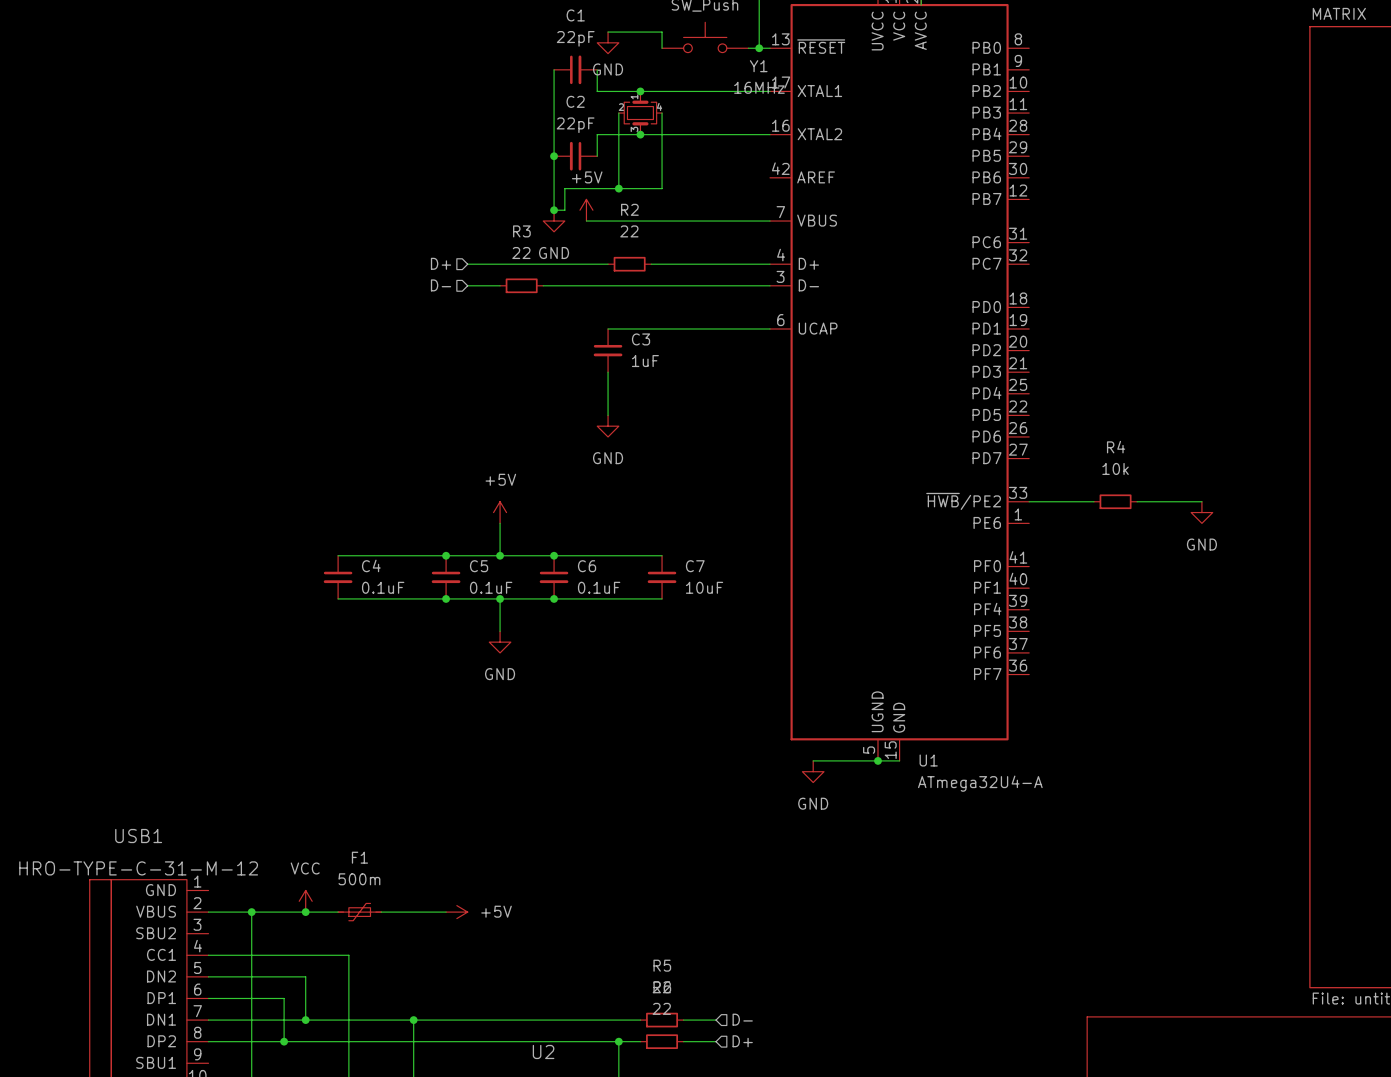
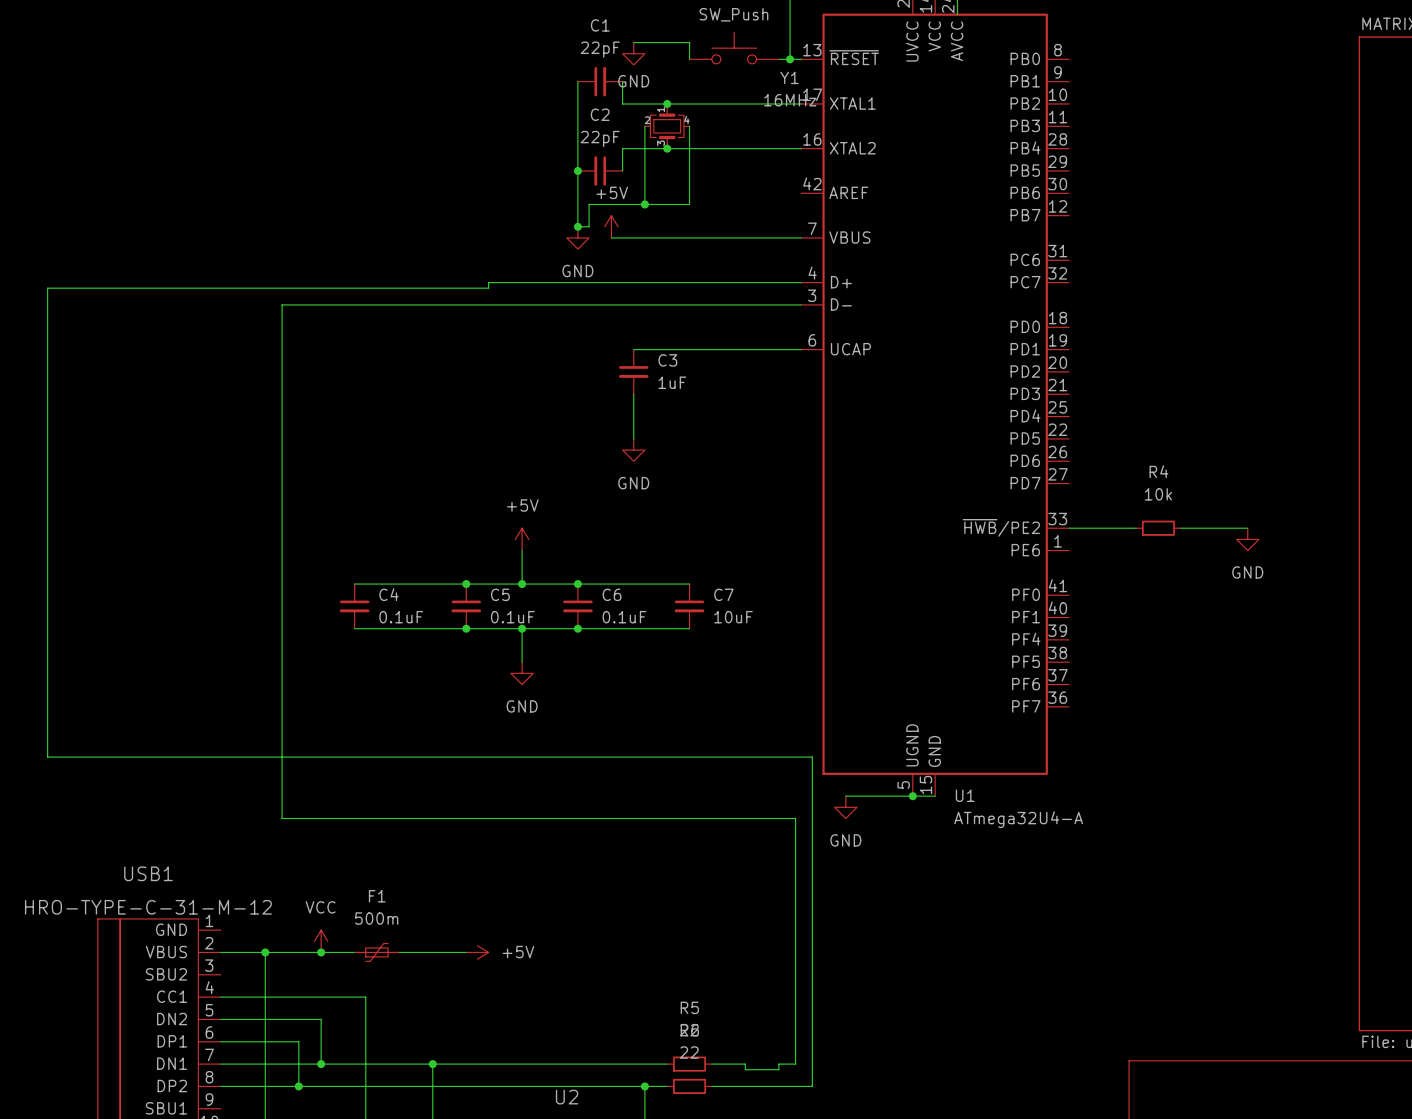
hierarchical label: D+ (441, 263) -> none
wire: none -> (488, 282) (488, 288) (47, 288) (47, 757) (812, 757) (812, 1086) (745, 1086)
wire: none -> (633, 282) (678, 282)
R2: 22 (629, 264) -> none
hierarchical label: D- (441, 285) -> none
wire: none -> (488, 304) (282, 304) (282, 818) (795, 818) (795, 1064) (778, 1064) (778, 1069) (745, 1069) (745, 1064)
wire: none -> (522, 304) (566, 304)
R3: 22 (521, 285) -> none
hierarchical label: D- (742, 1019) -> none
hierarchical label: D+ (742, 1041) -> none

